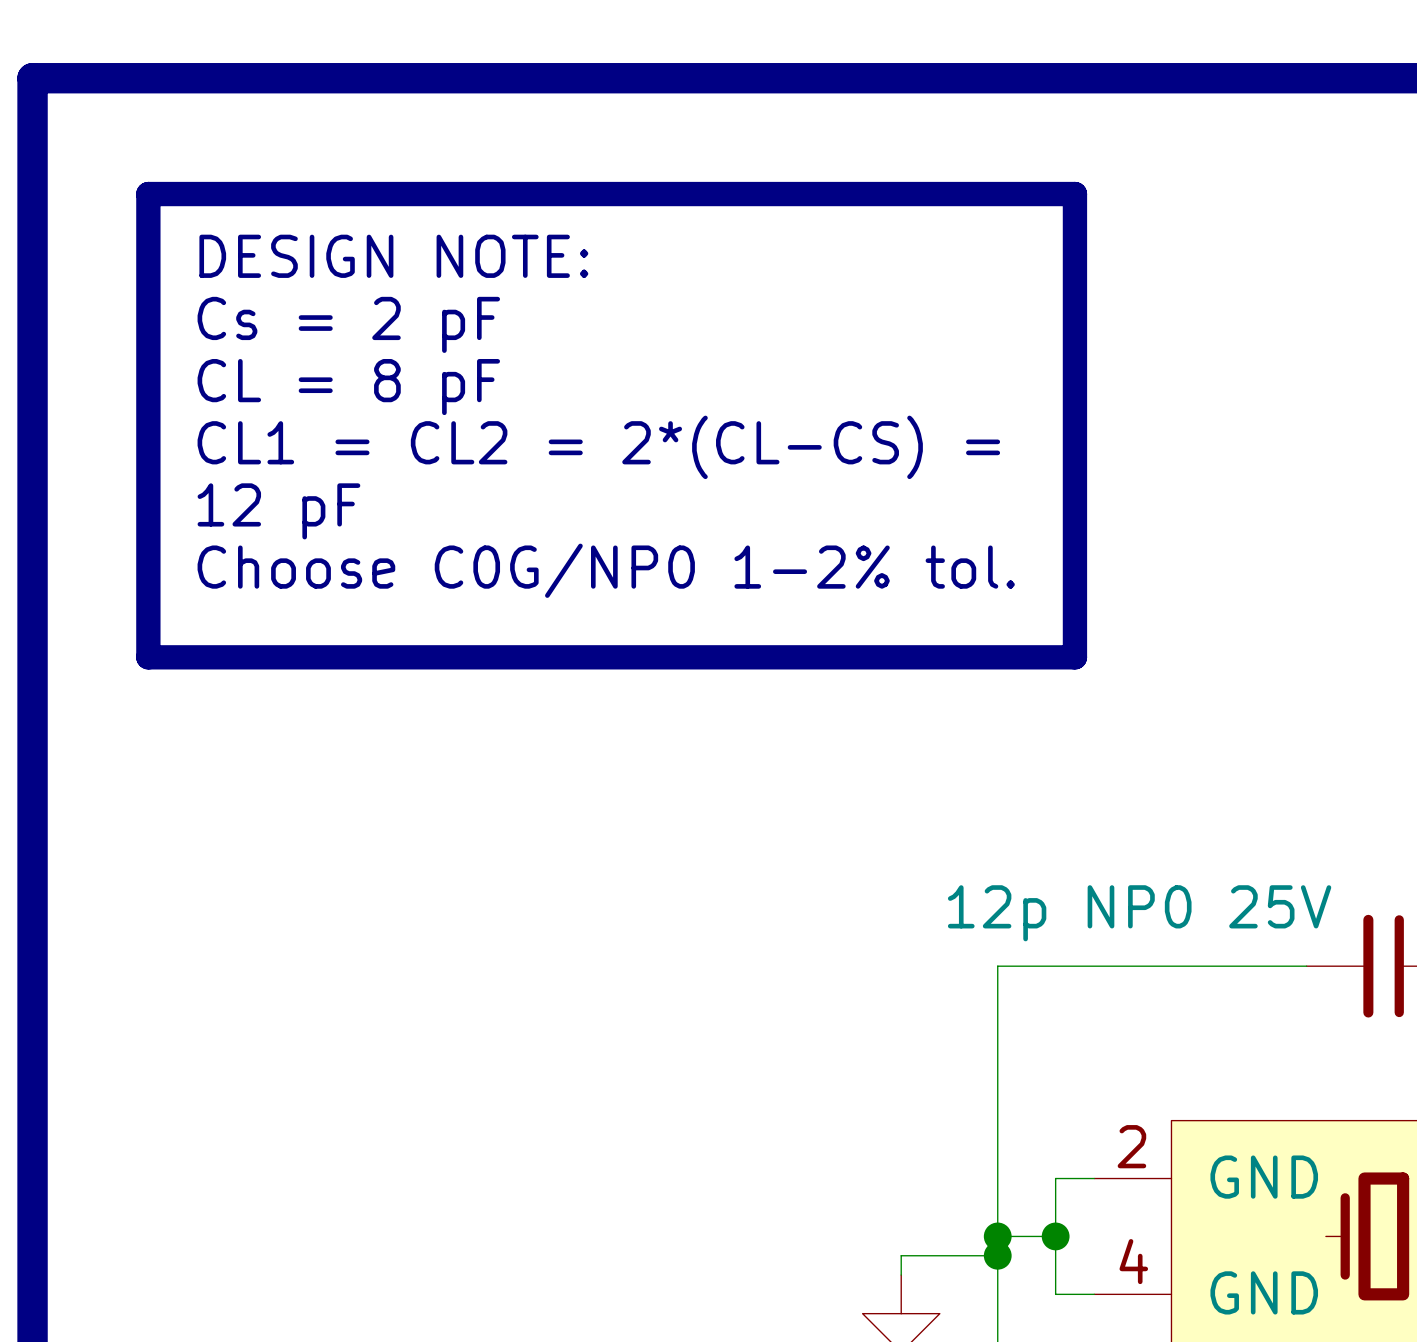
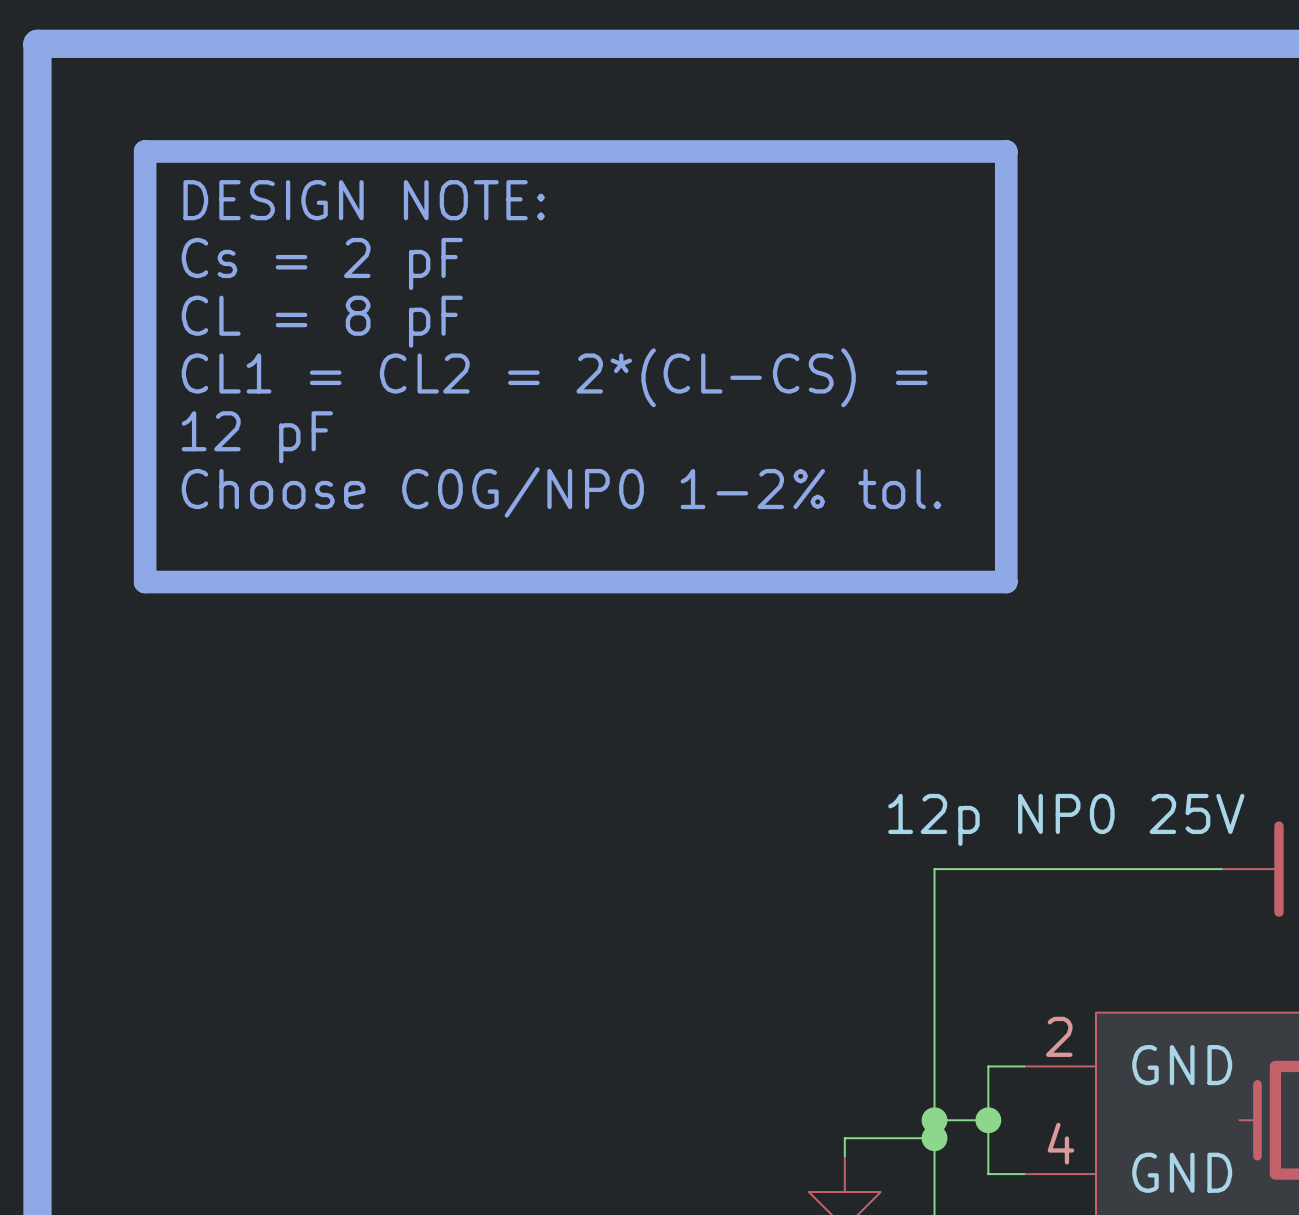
text position: DESIGN NOTE: (393, 256) -> DESIGN NOTE: (364, 200)
text position: Cs = 2 pF (348, 324) -> Cs = 2 pF (322, 263)
text position: CL = 8 pF (348, 387) -> CL = 8 pF (322, 321)
text position: CL1 = CL2 = 2*(CL-CS) = (598, 447) -> CL1 = CL2 = 2*(CL-CS) = (554, 377)
text position: 12 pF (278, 511) -> 12 pF (257, 437)
text position: Choose C0G/NP0 1-2% tol. (606, 570) -> Choose C0G/NP0 1-2% tol. (561, 492)

